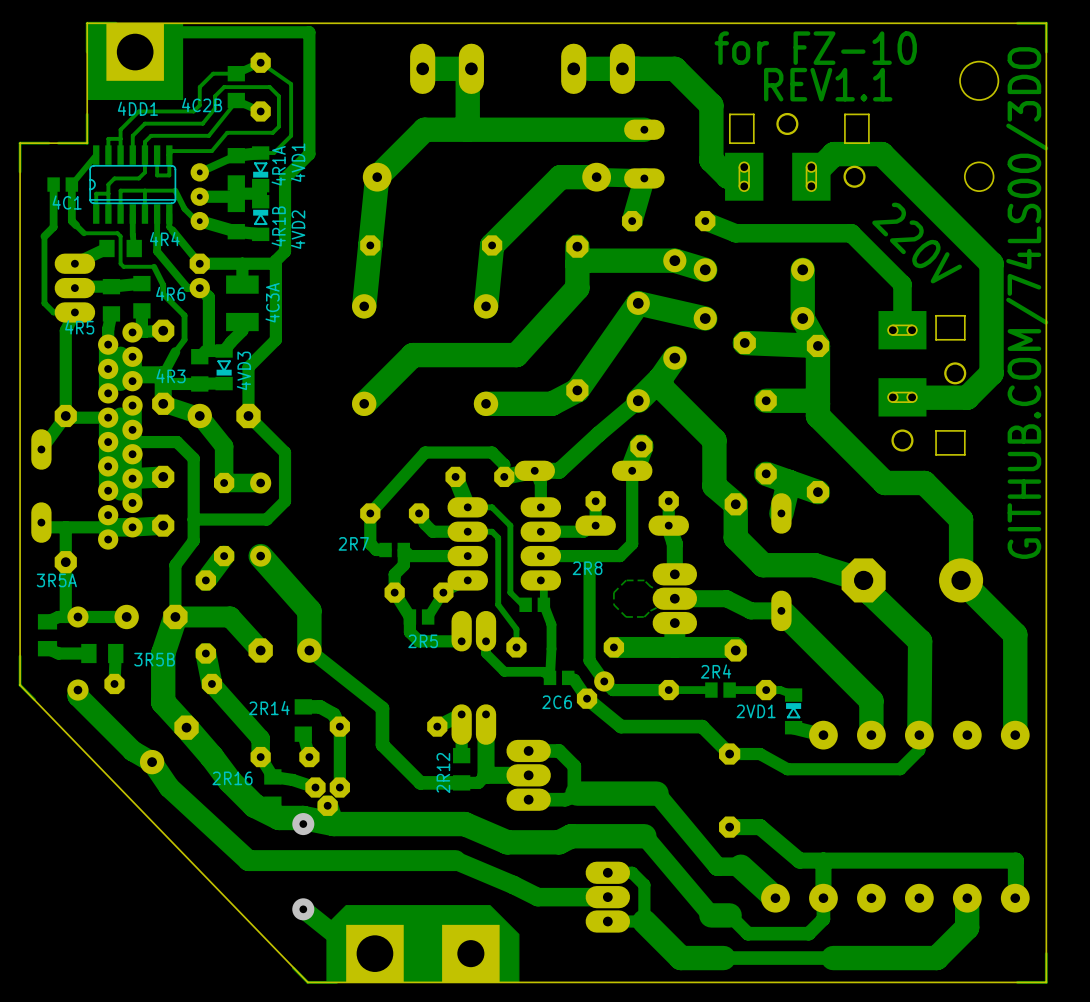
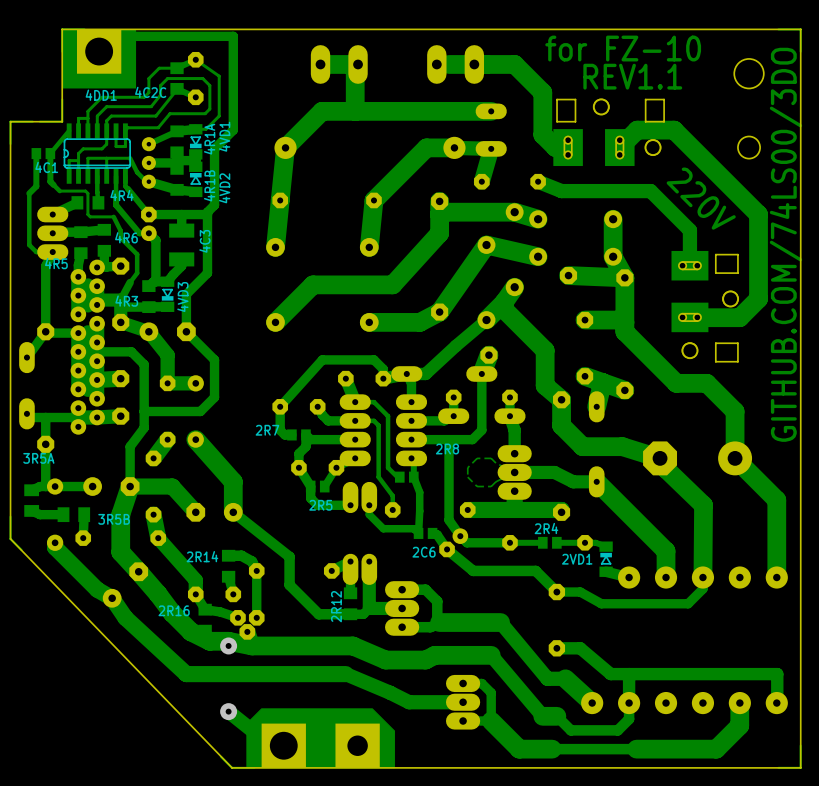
4C2B name: 4C2B (202, 105) -> 4C2C (150, 92)
4C3A name: 4C3A (272, 302) -> 4C3 (204, 241)

